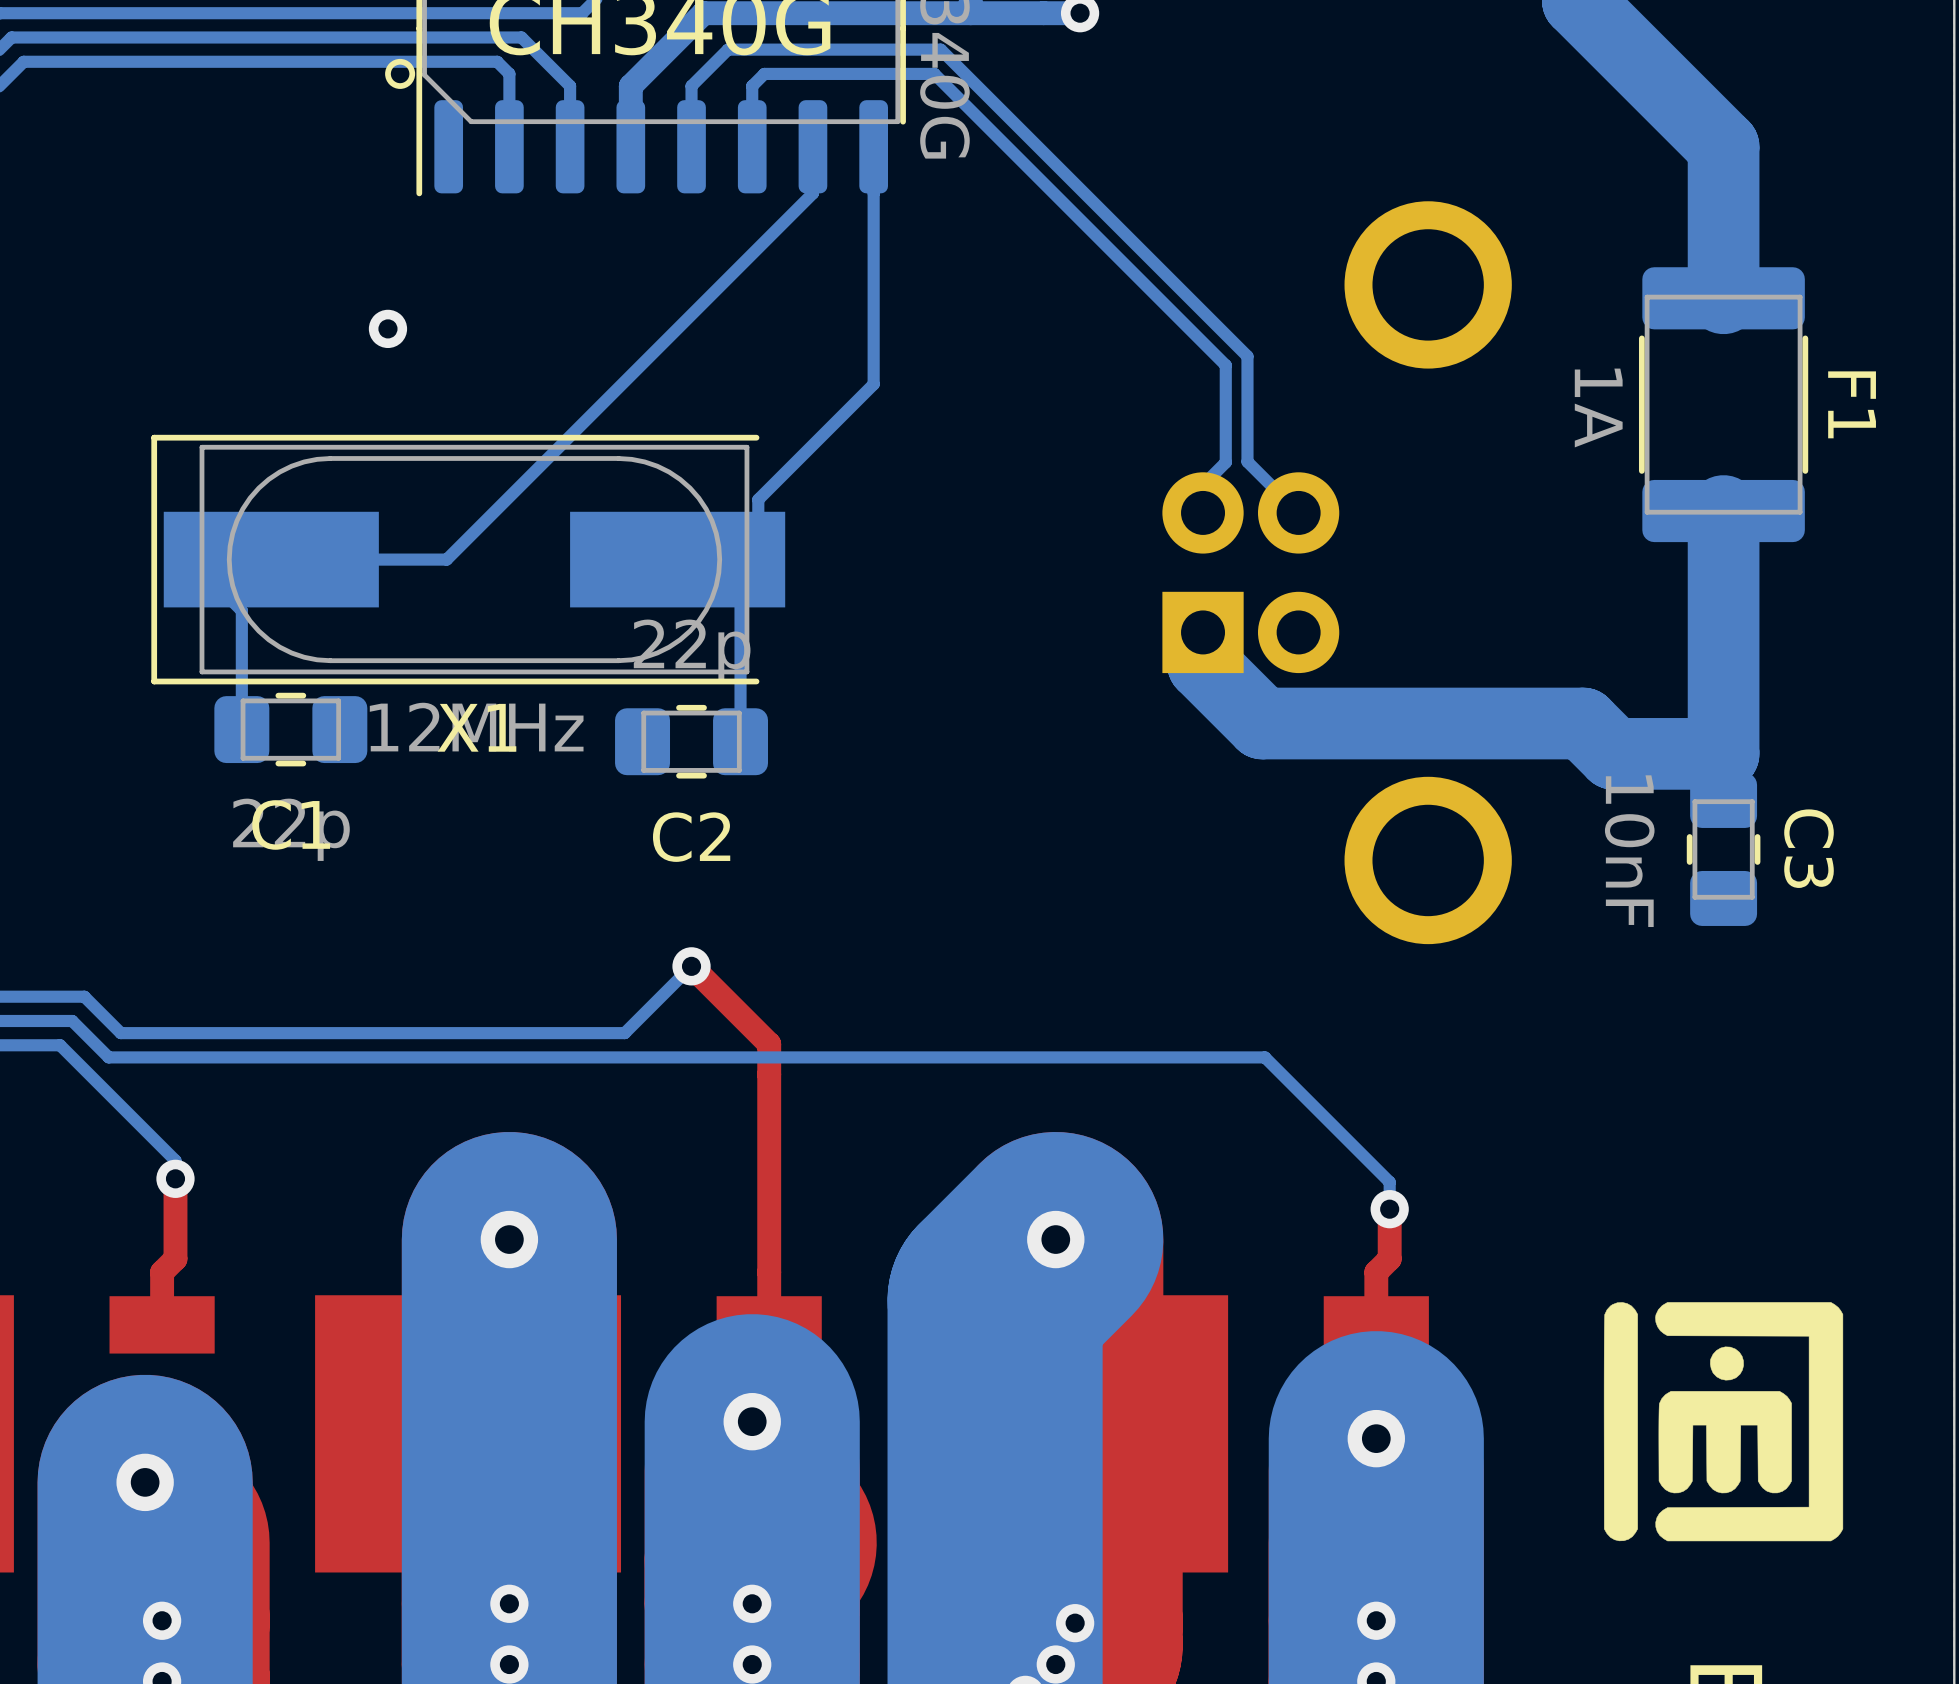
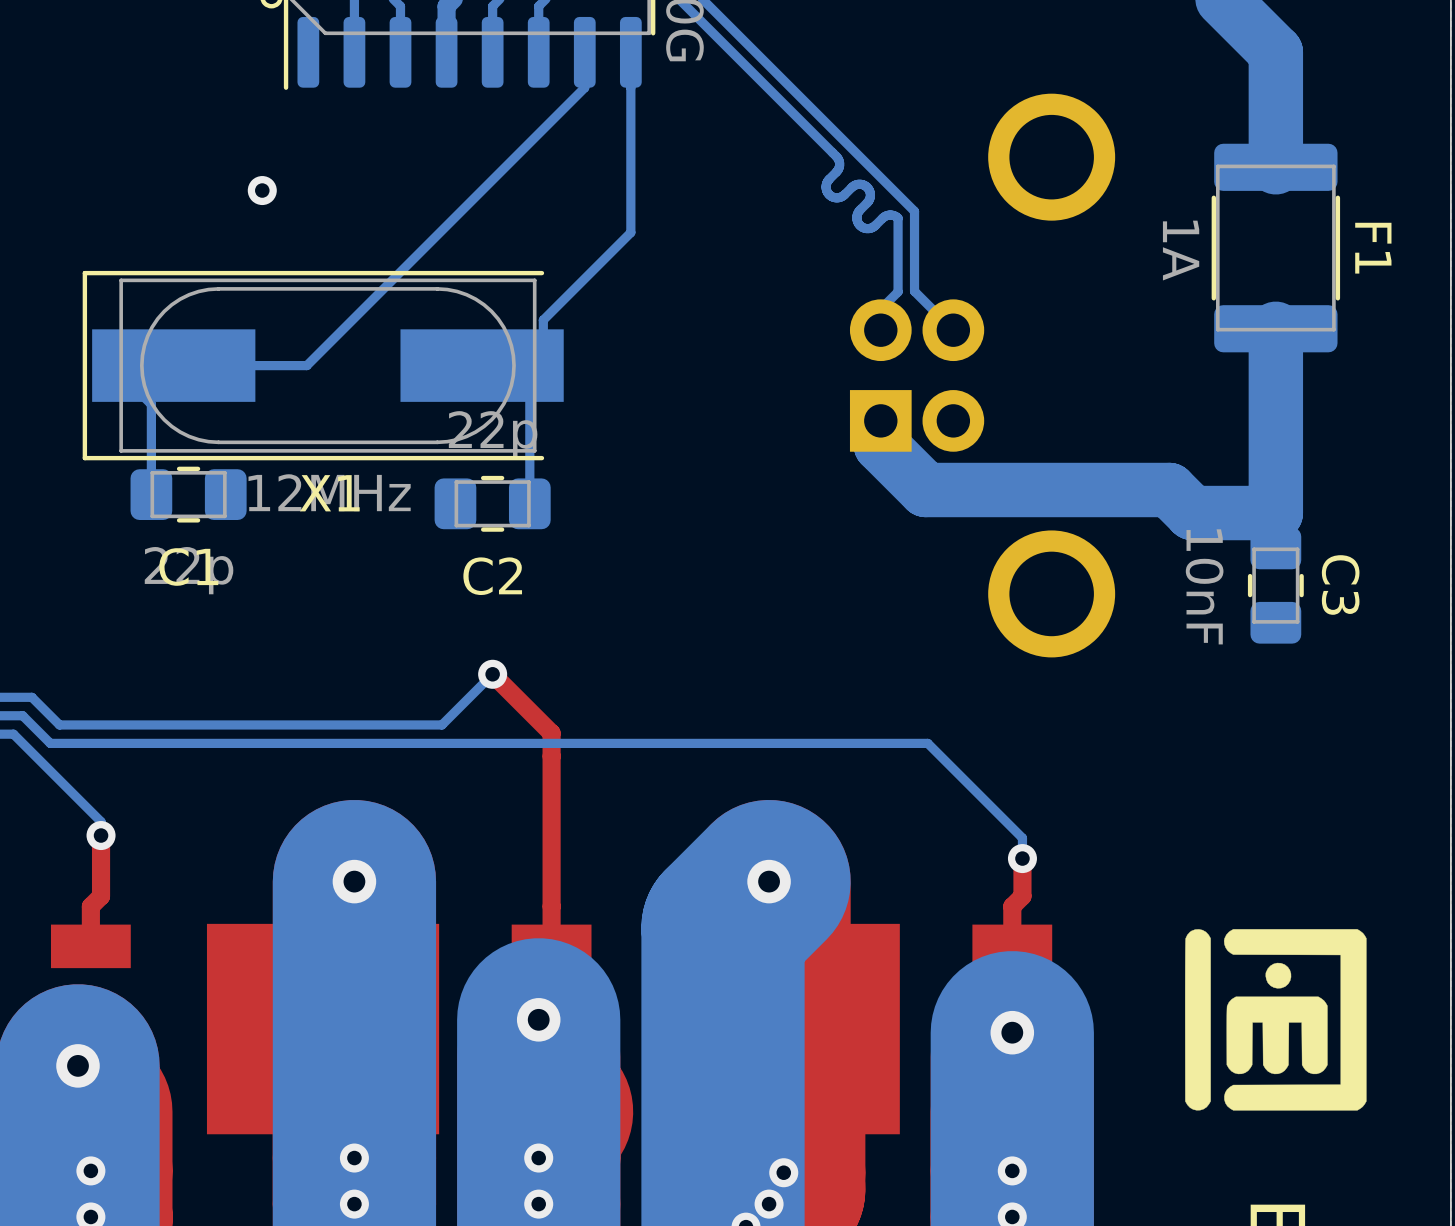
bottom track: (1144, 284) (1225, 365) -> (836, 156) (839, 165) (826, 183) (826, 188) (829, 194) (835, 197) (840, 197) (853, 185) (863, 184) (868, 189) (870, 196) (857, 214) (856, 219) (859, 225) (866, 228) (871, 228) (889, 215) (898, 218)

